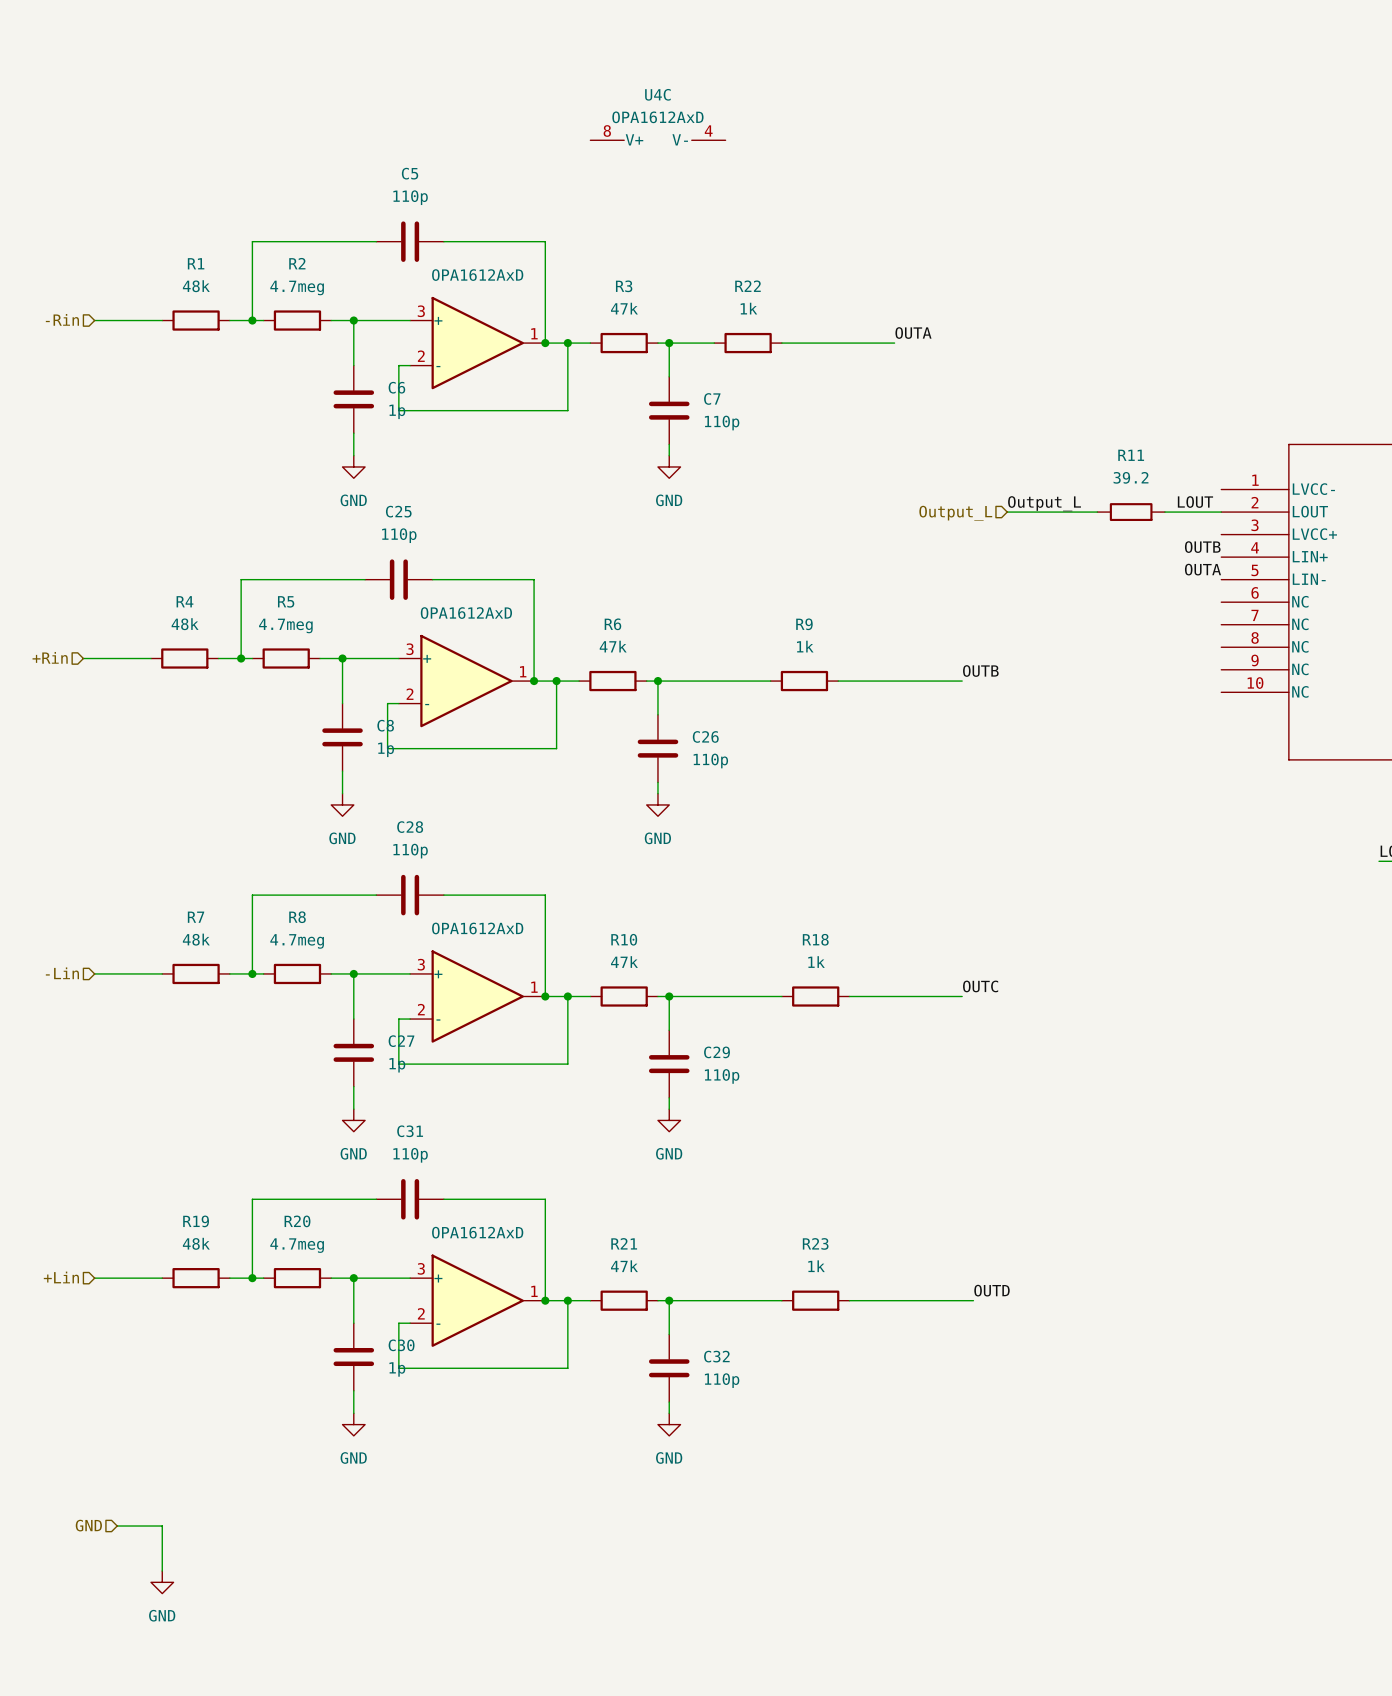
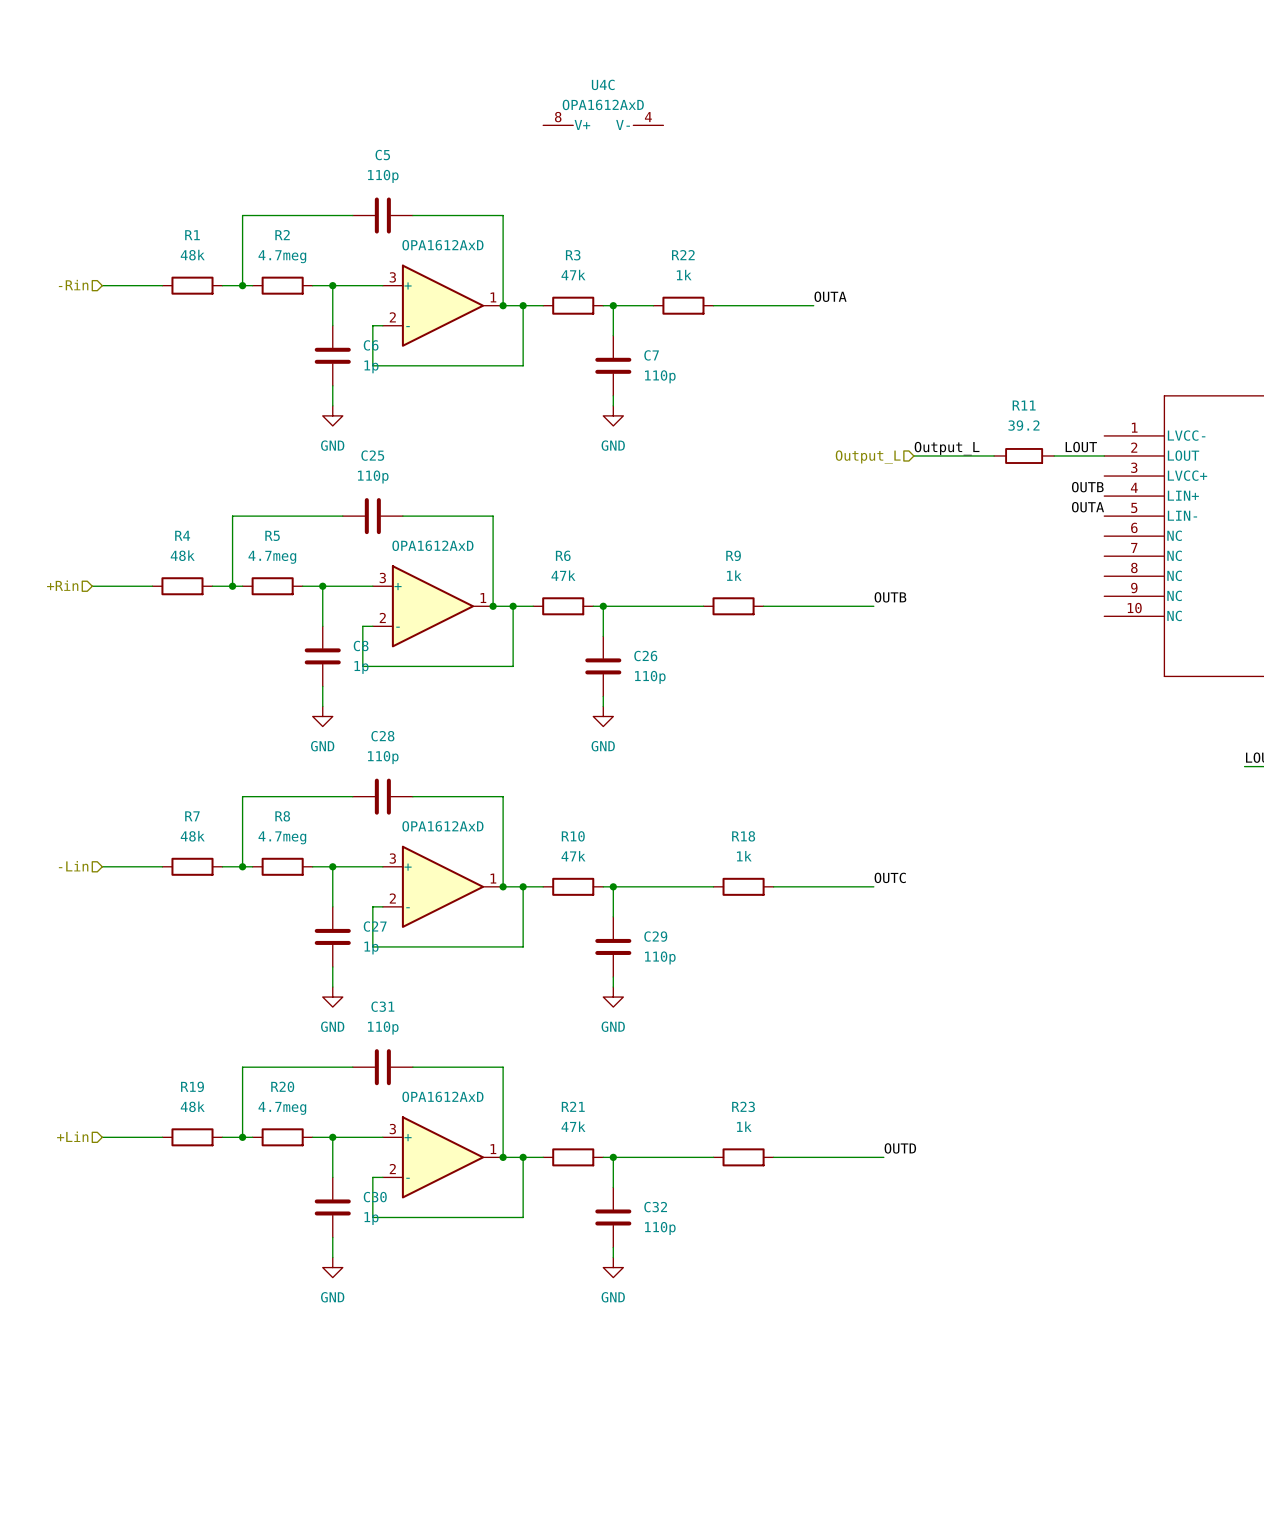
hierarchical label: GND (88, 1525) -> none
wire: (117, 1526) (162, 1526) (162, 1571) -> none
power symbol: GND (162, 1582) -> none

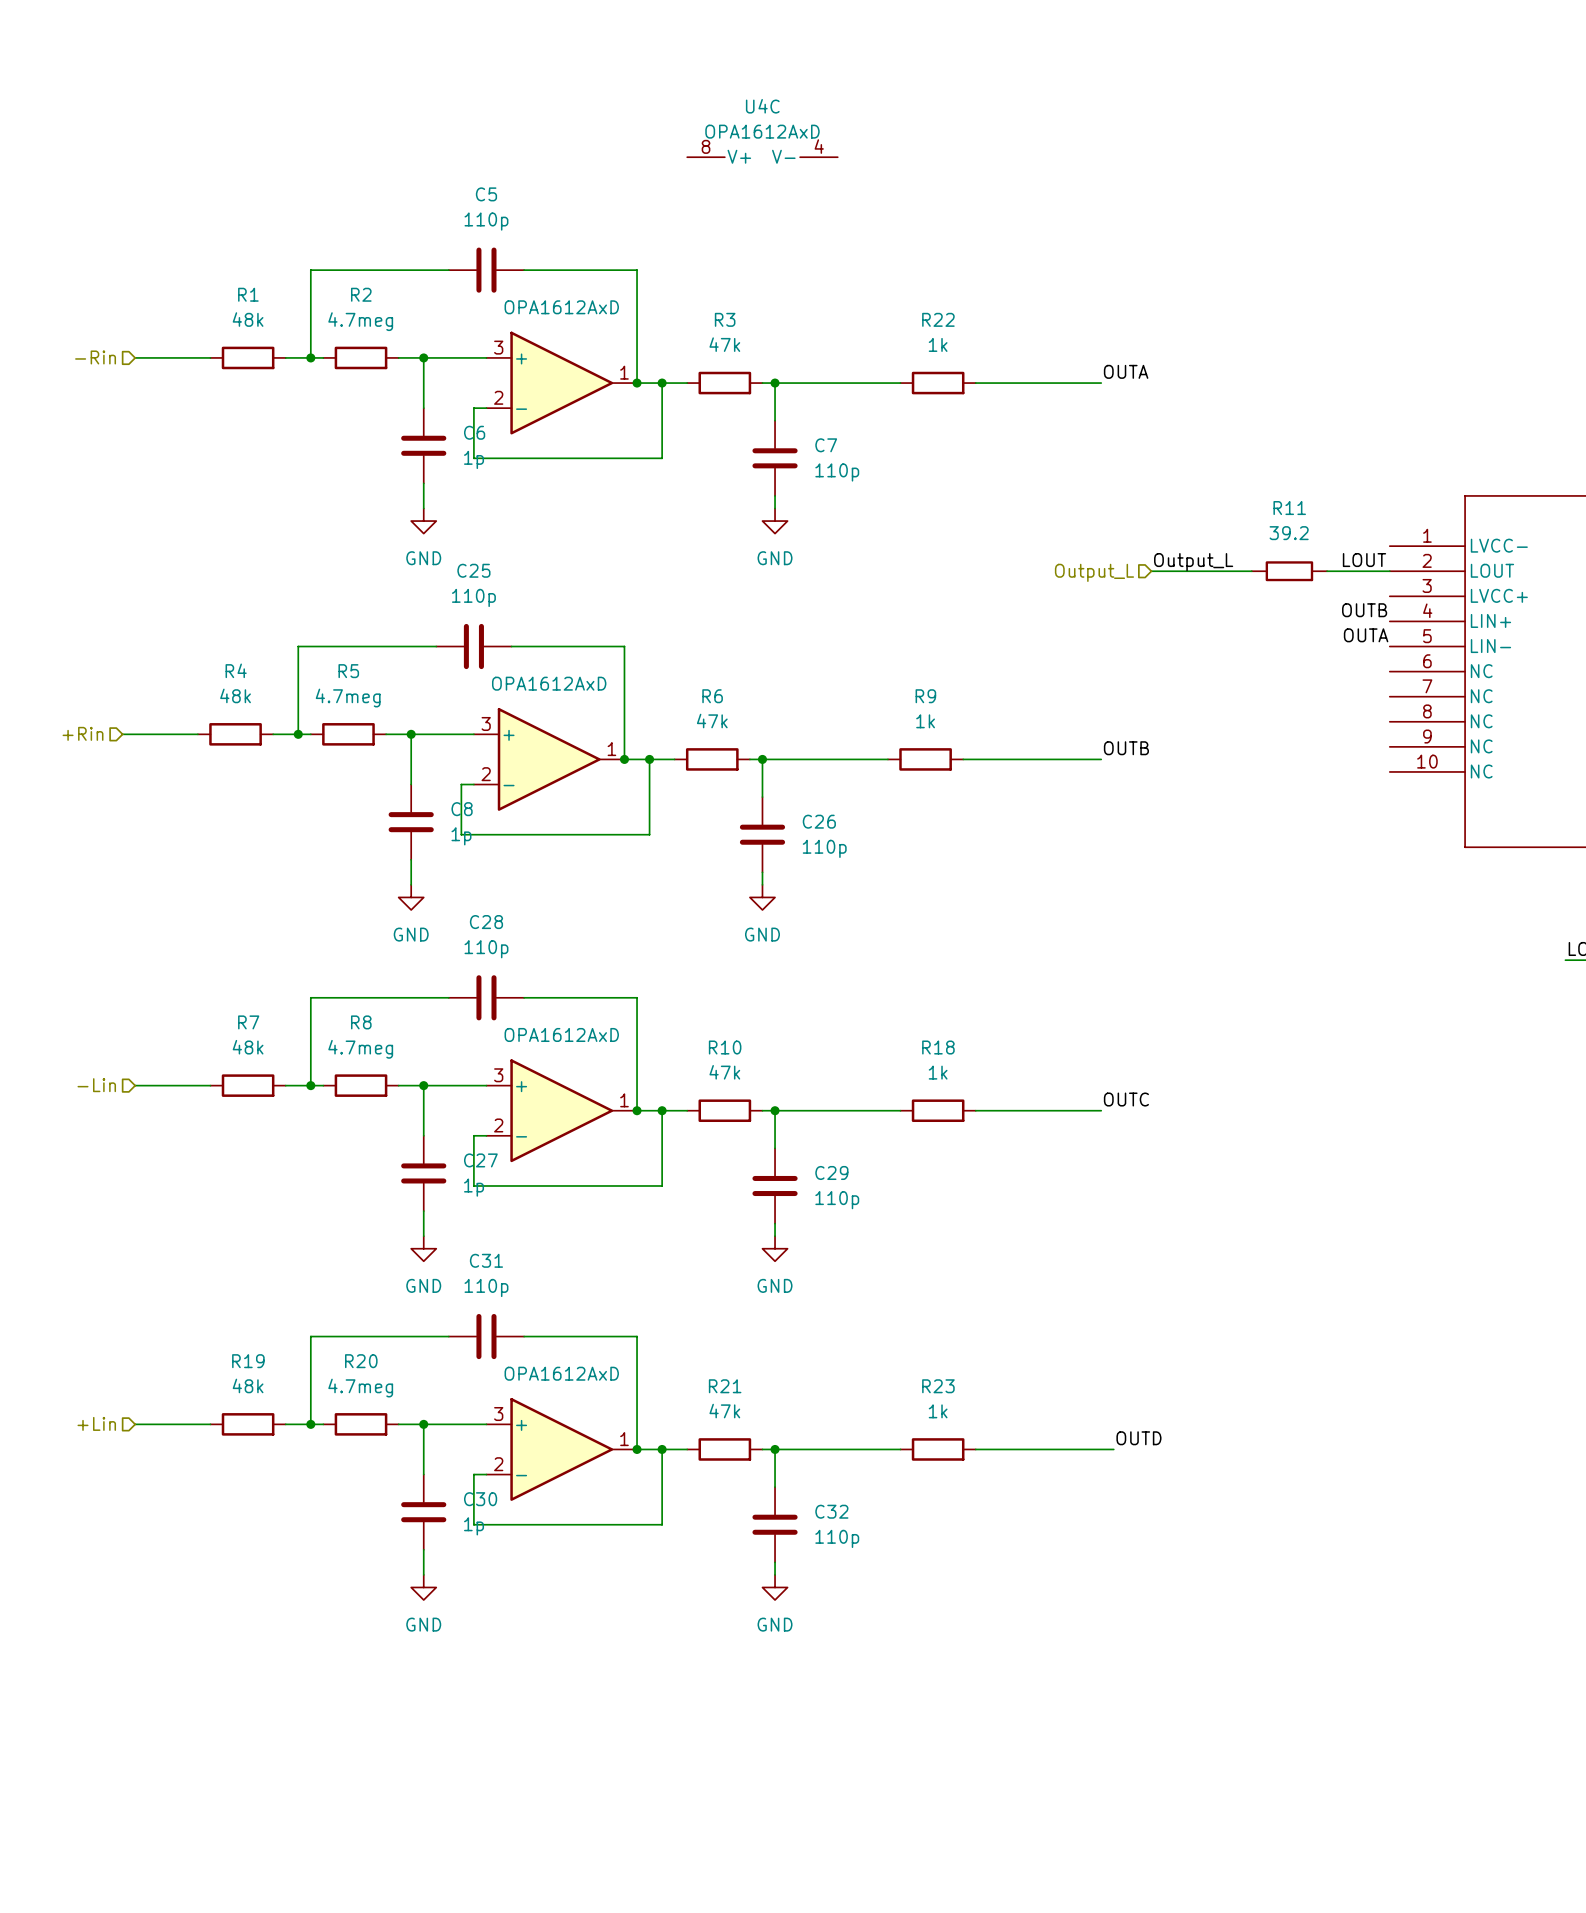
label position: OUTA (830, 296) -> OUTA (1126, 371)
R22 position: (683, 305) -> (938, 383)
wire: (713, 305) (773, 305) -> (900, 383) (825, 383)
wire: none -> (1025, 383) (1101, 383)

